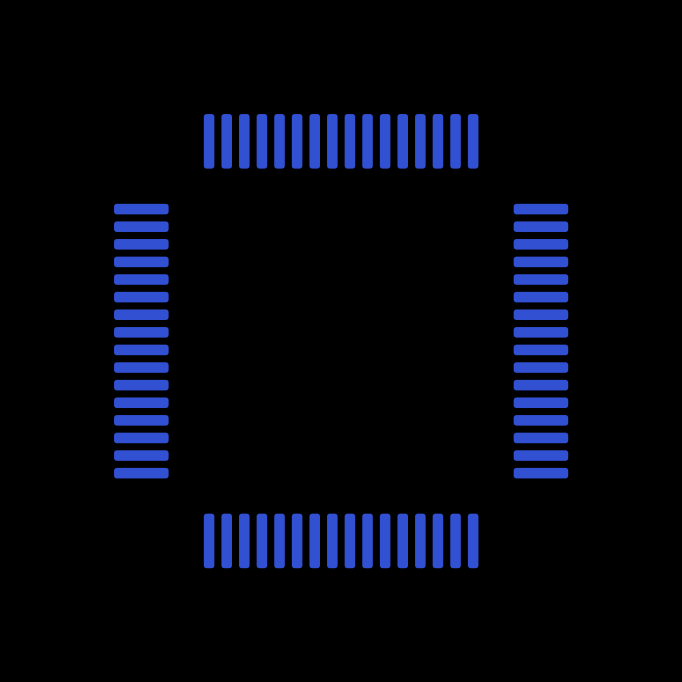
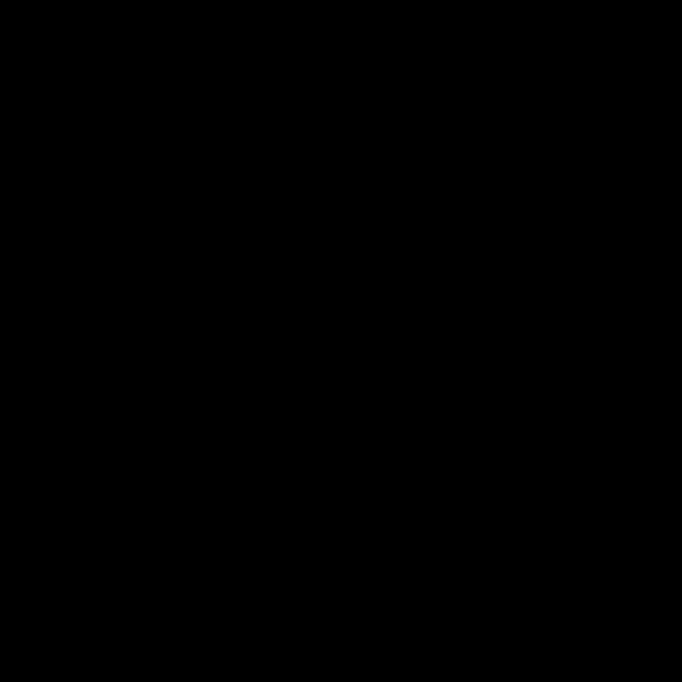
part: (341, 341) -> none

